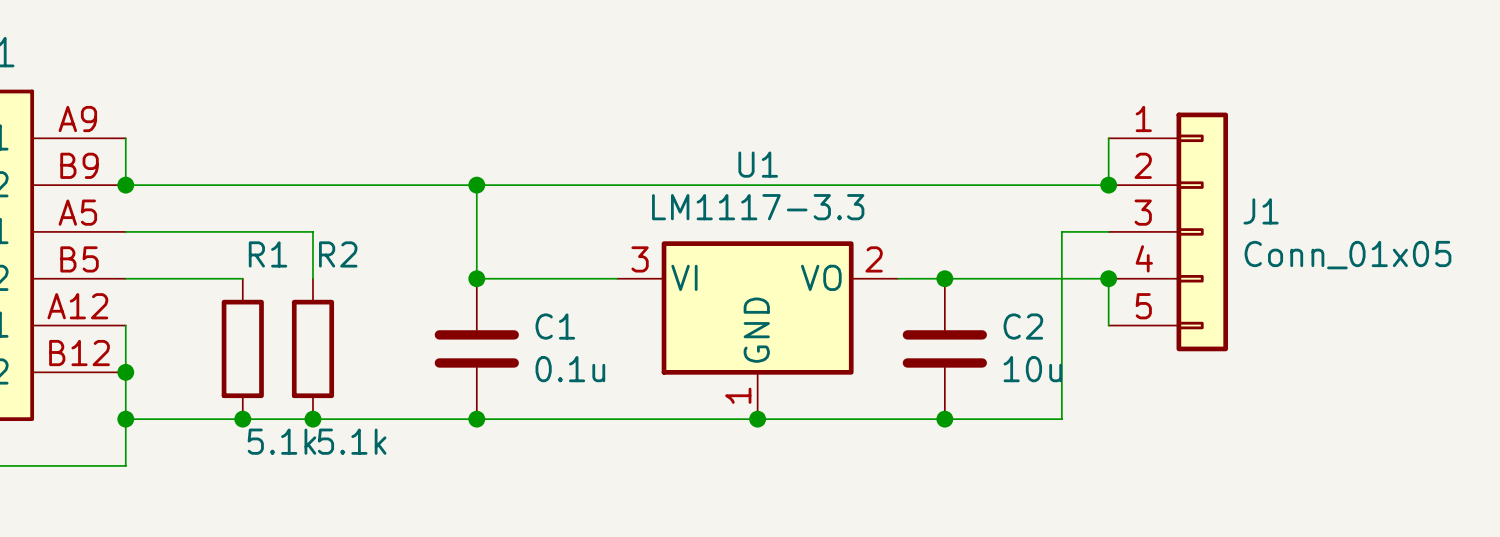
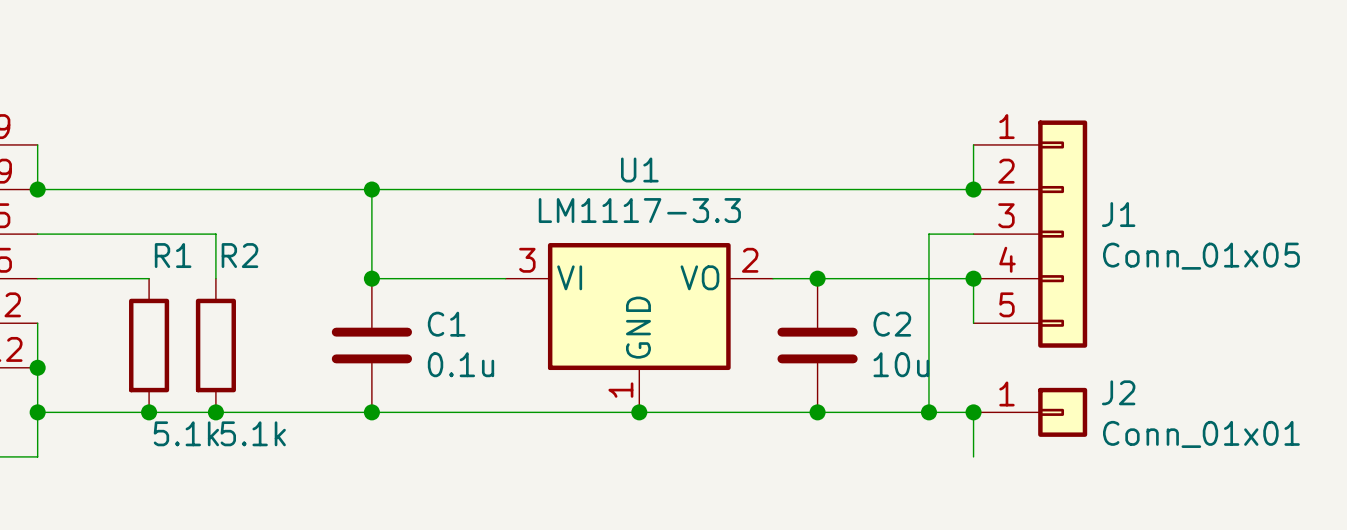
wire: none -> (928, 412) (973, 412) (973, 456)
junction: none -> (928, 412)
junction: none -> (973, 412)
J2: none -> Conn_01x01 (1030, 412)

